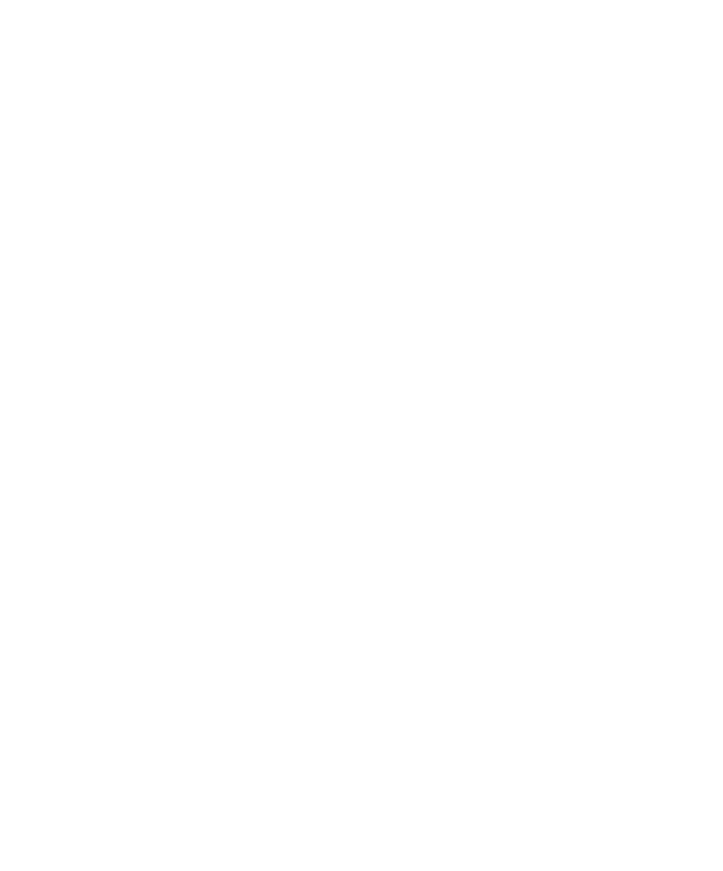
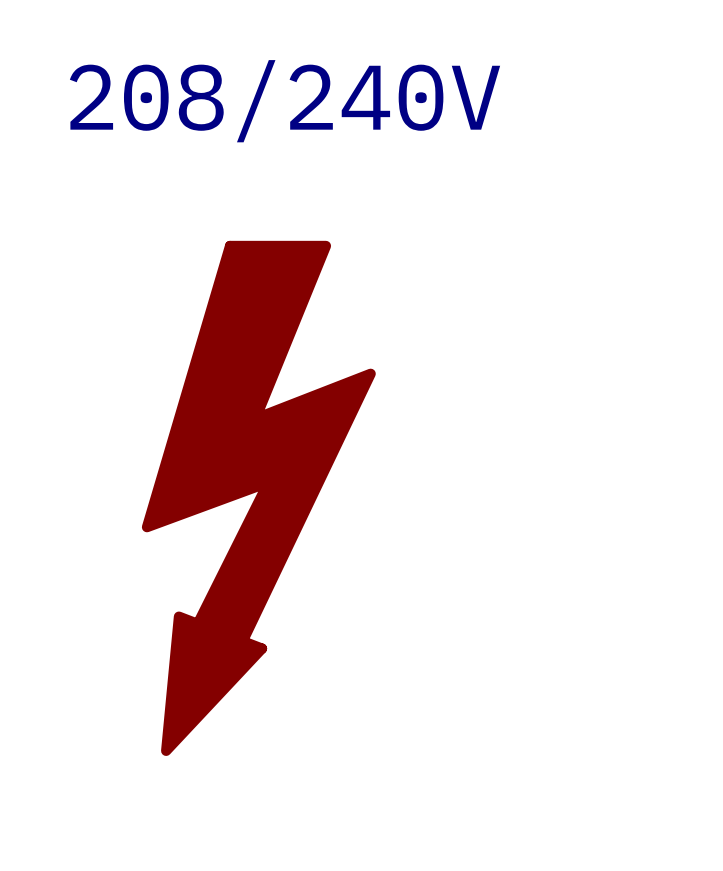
text: none -> 208/240V (285, 101)
power symbol: none -> (258, 498)

